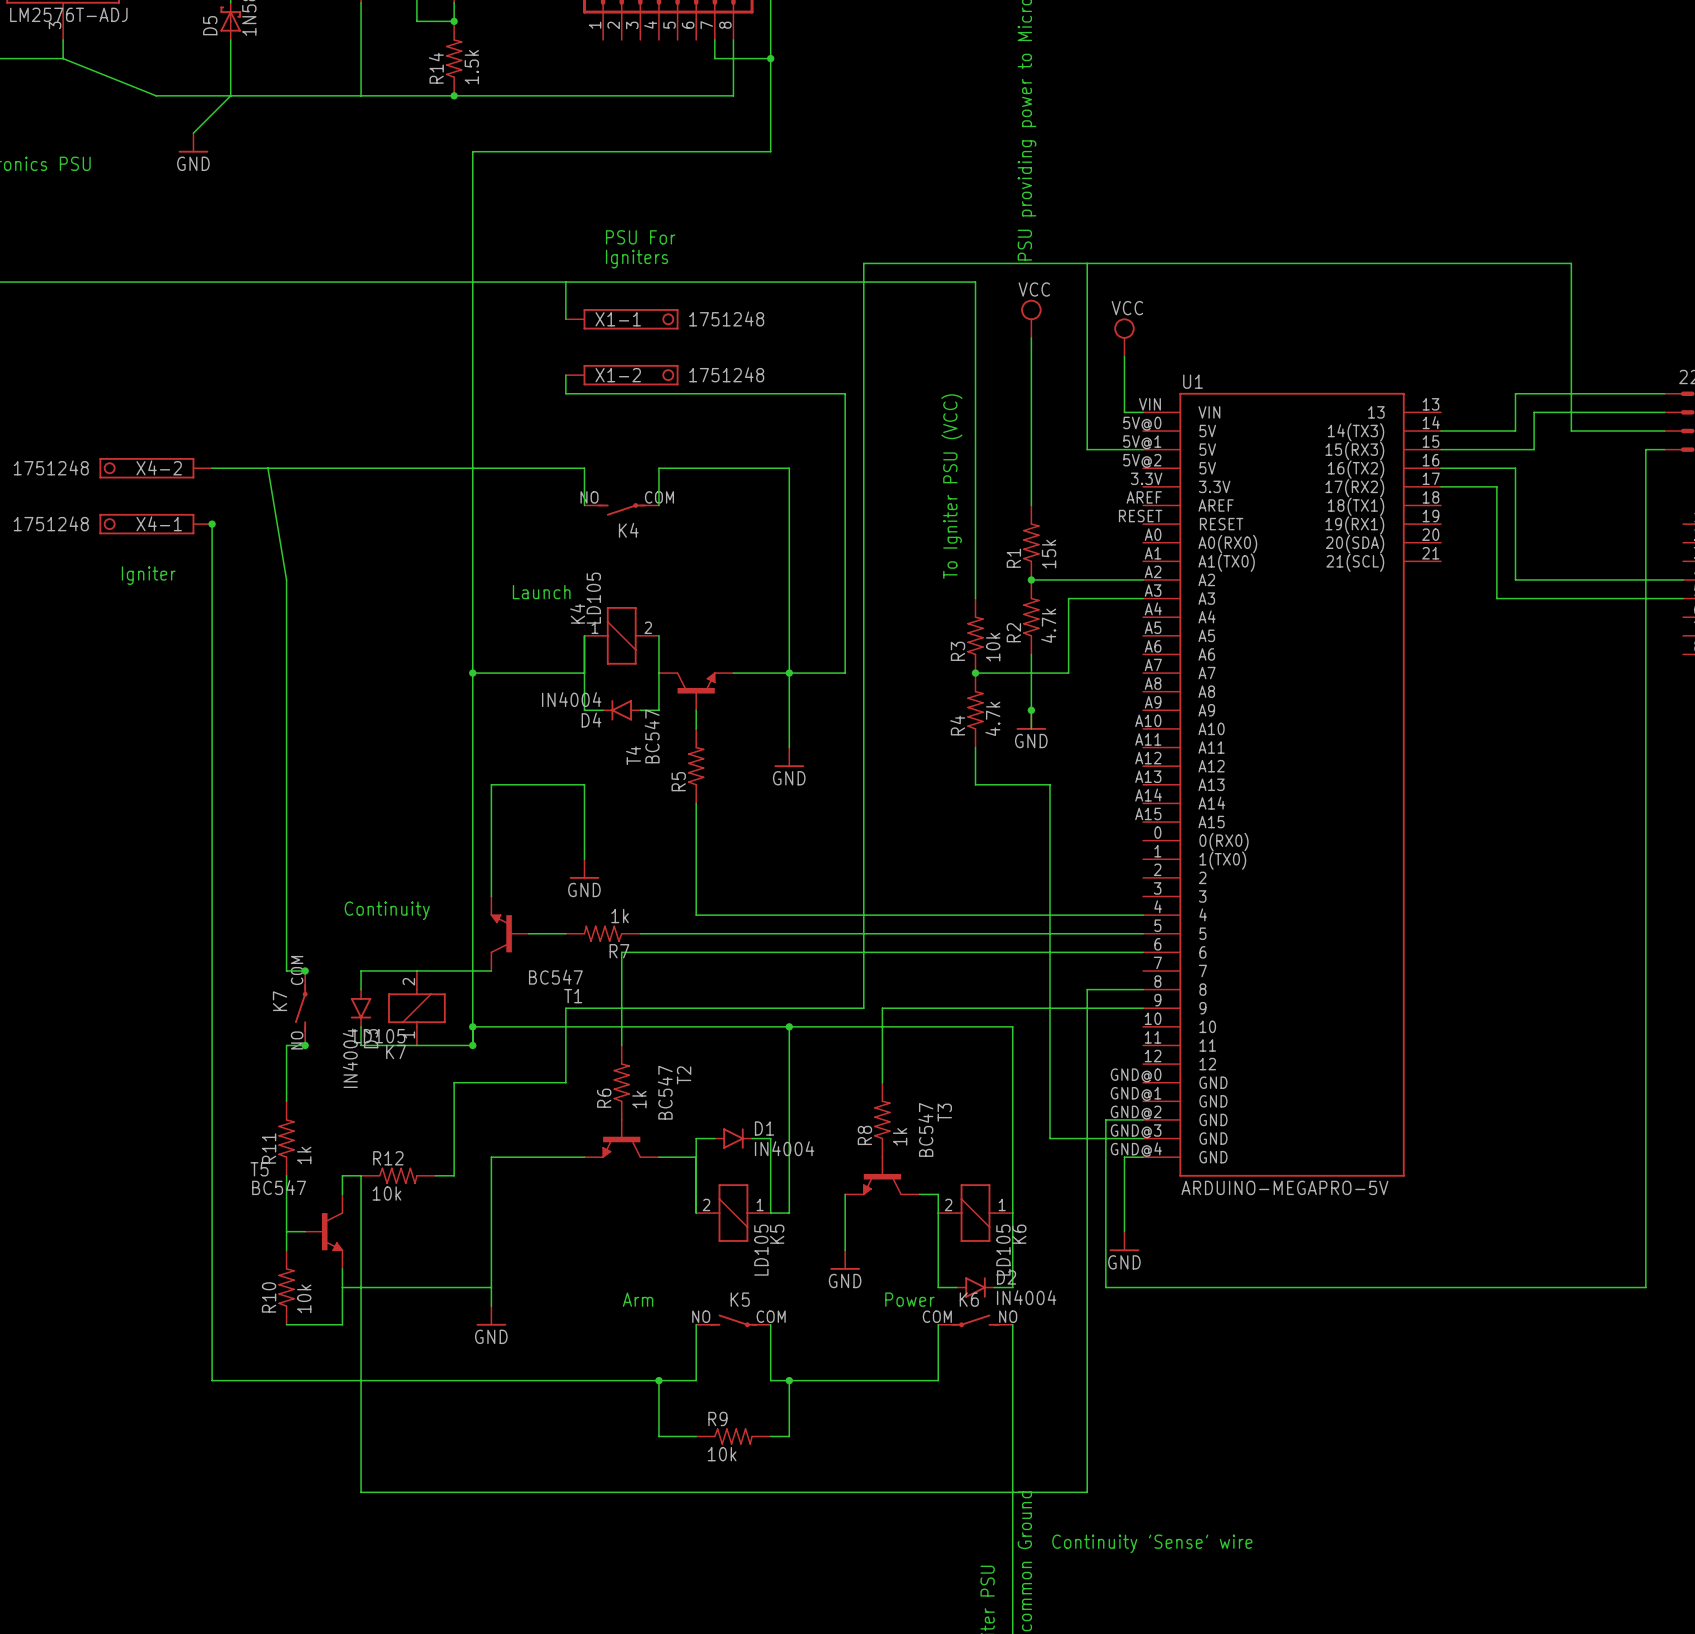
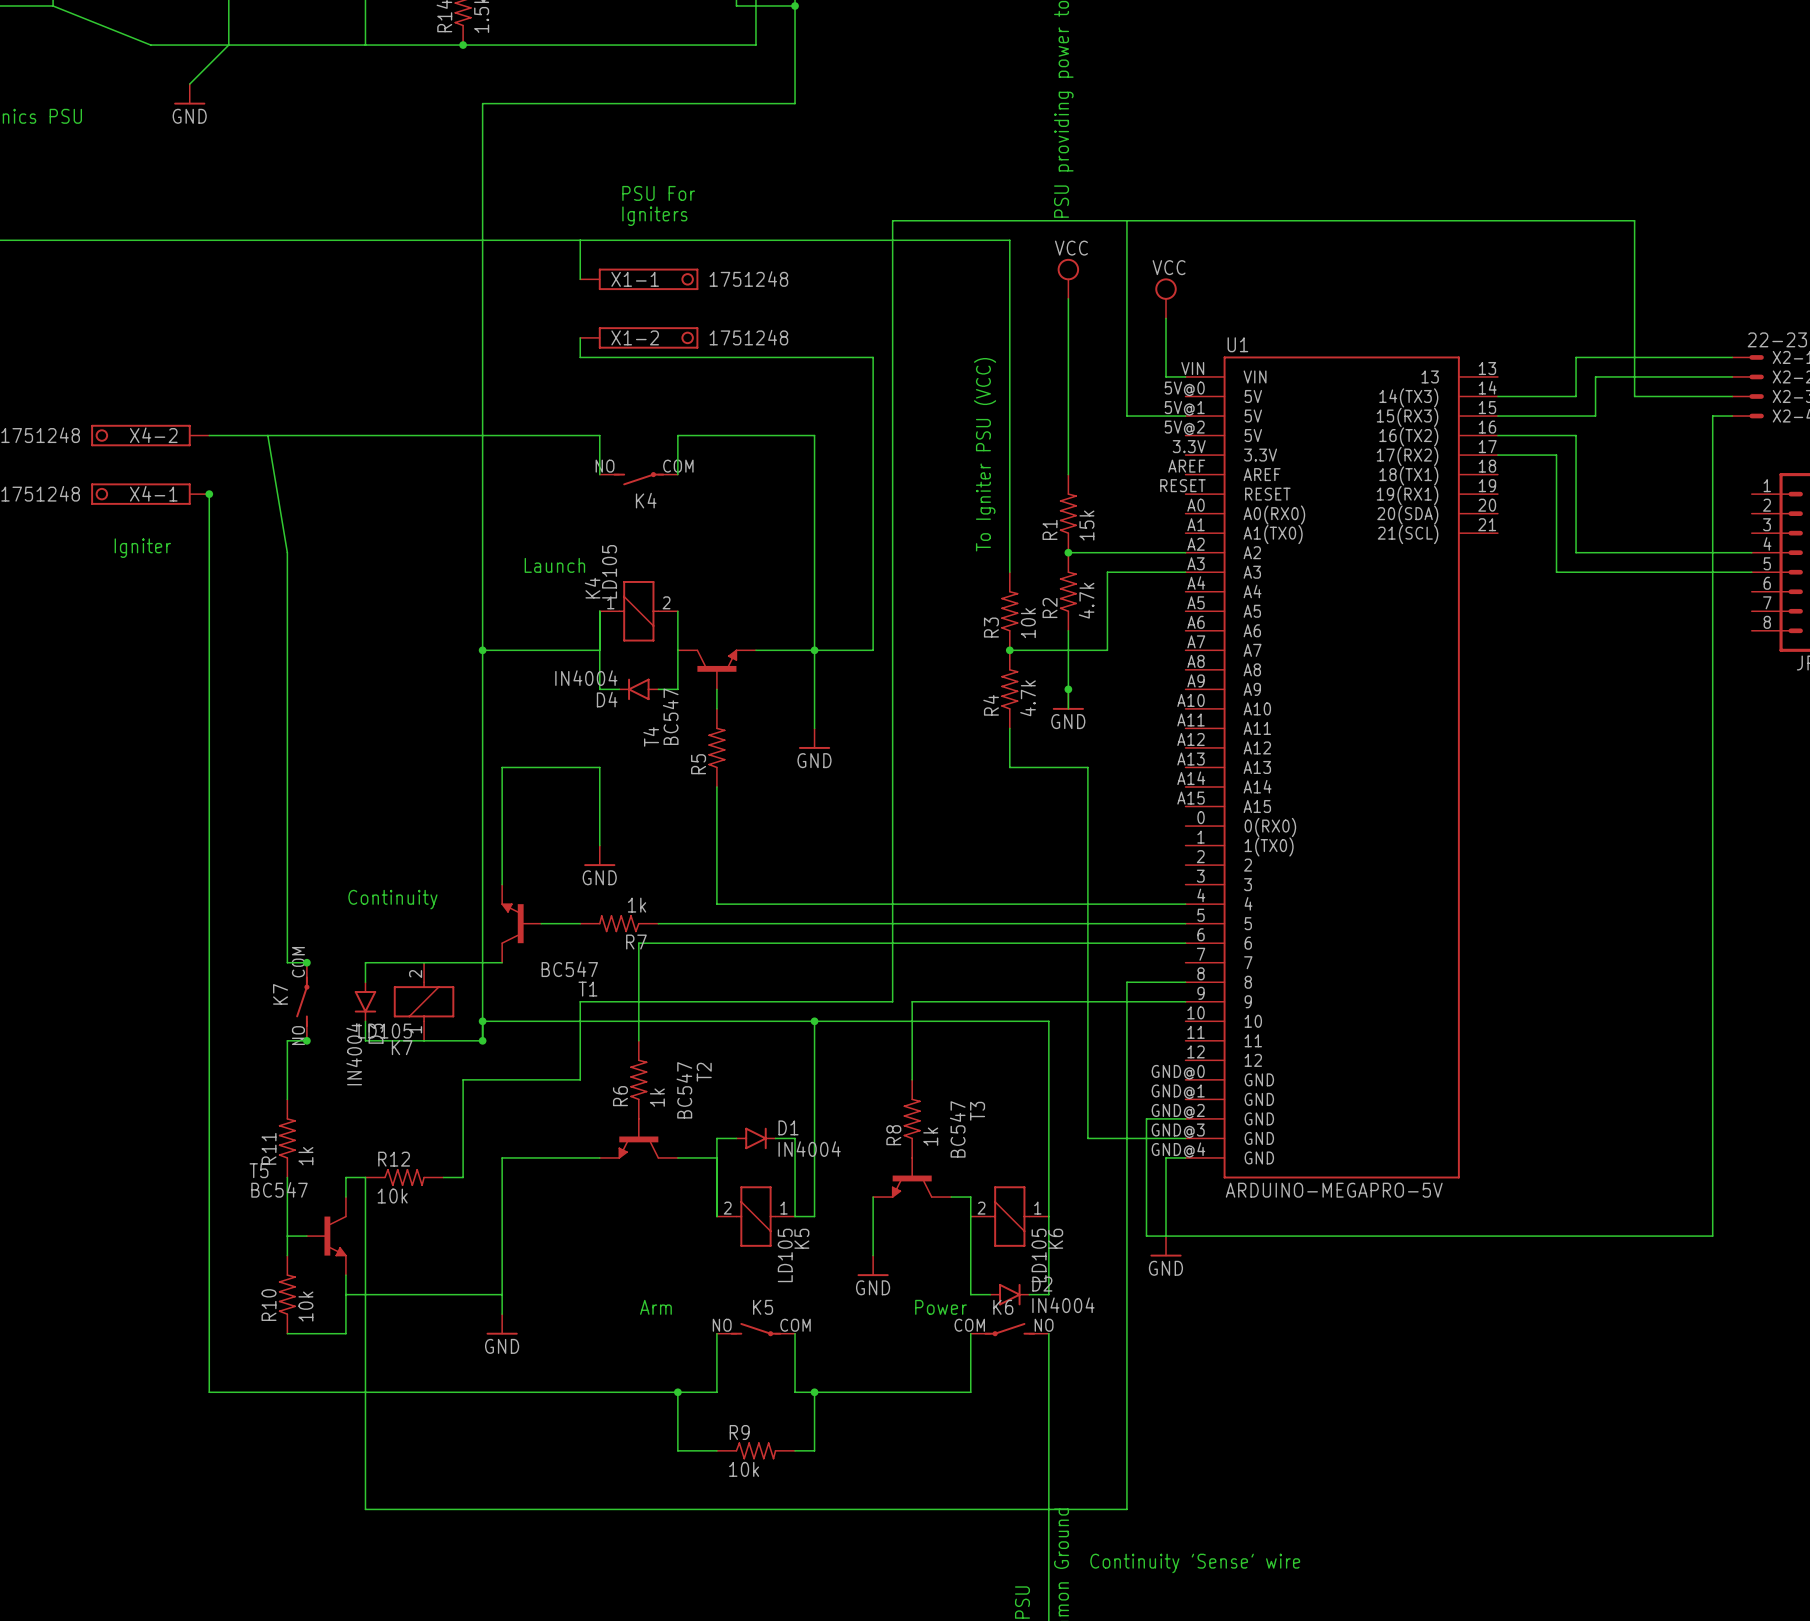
wire: (1105, 1231) (1105, 1287) (1645, 1287) (1645, 1231) -> (1146, 1236) (1712, 1236)

